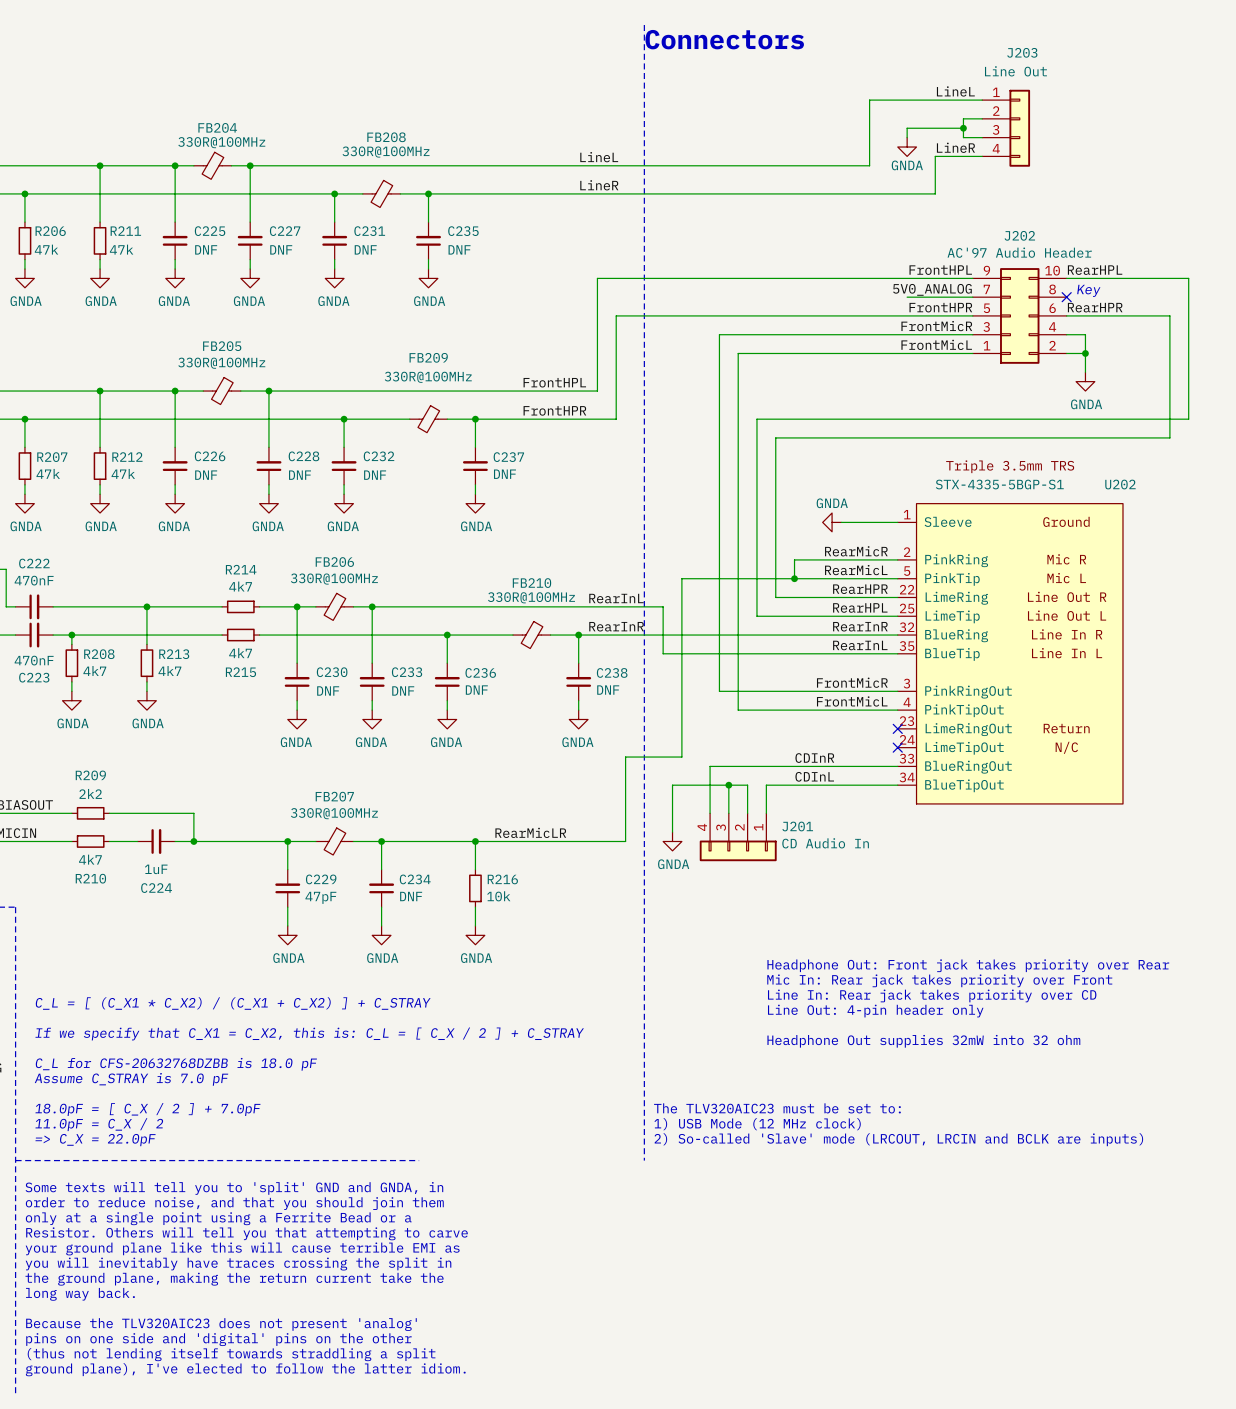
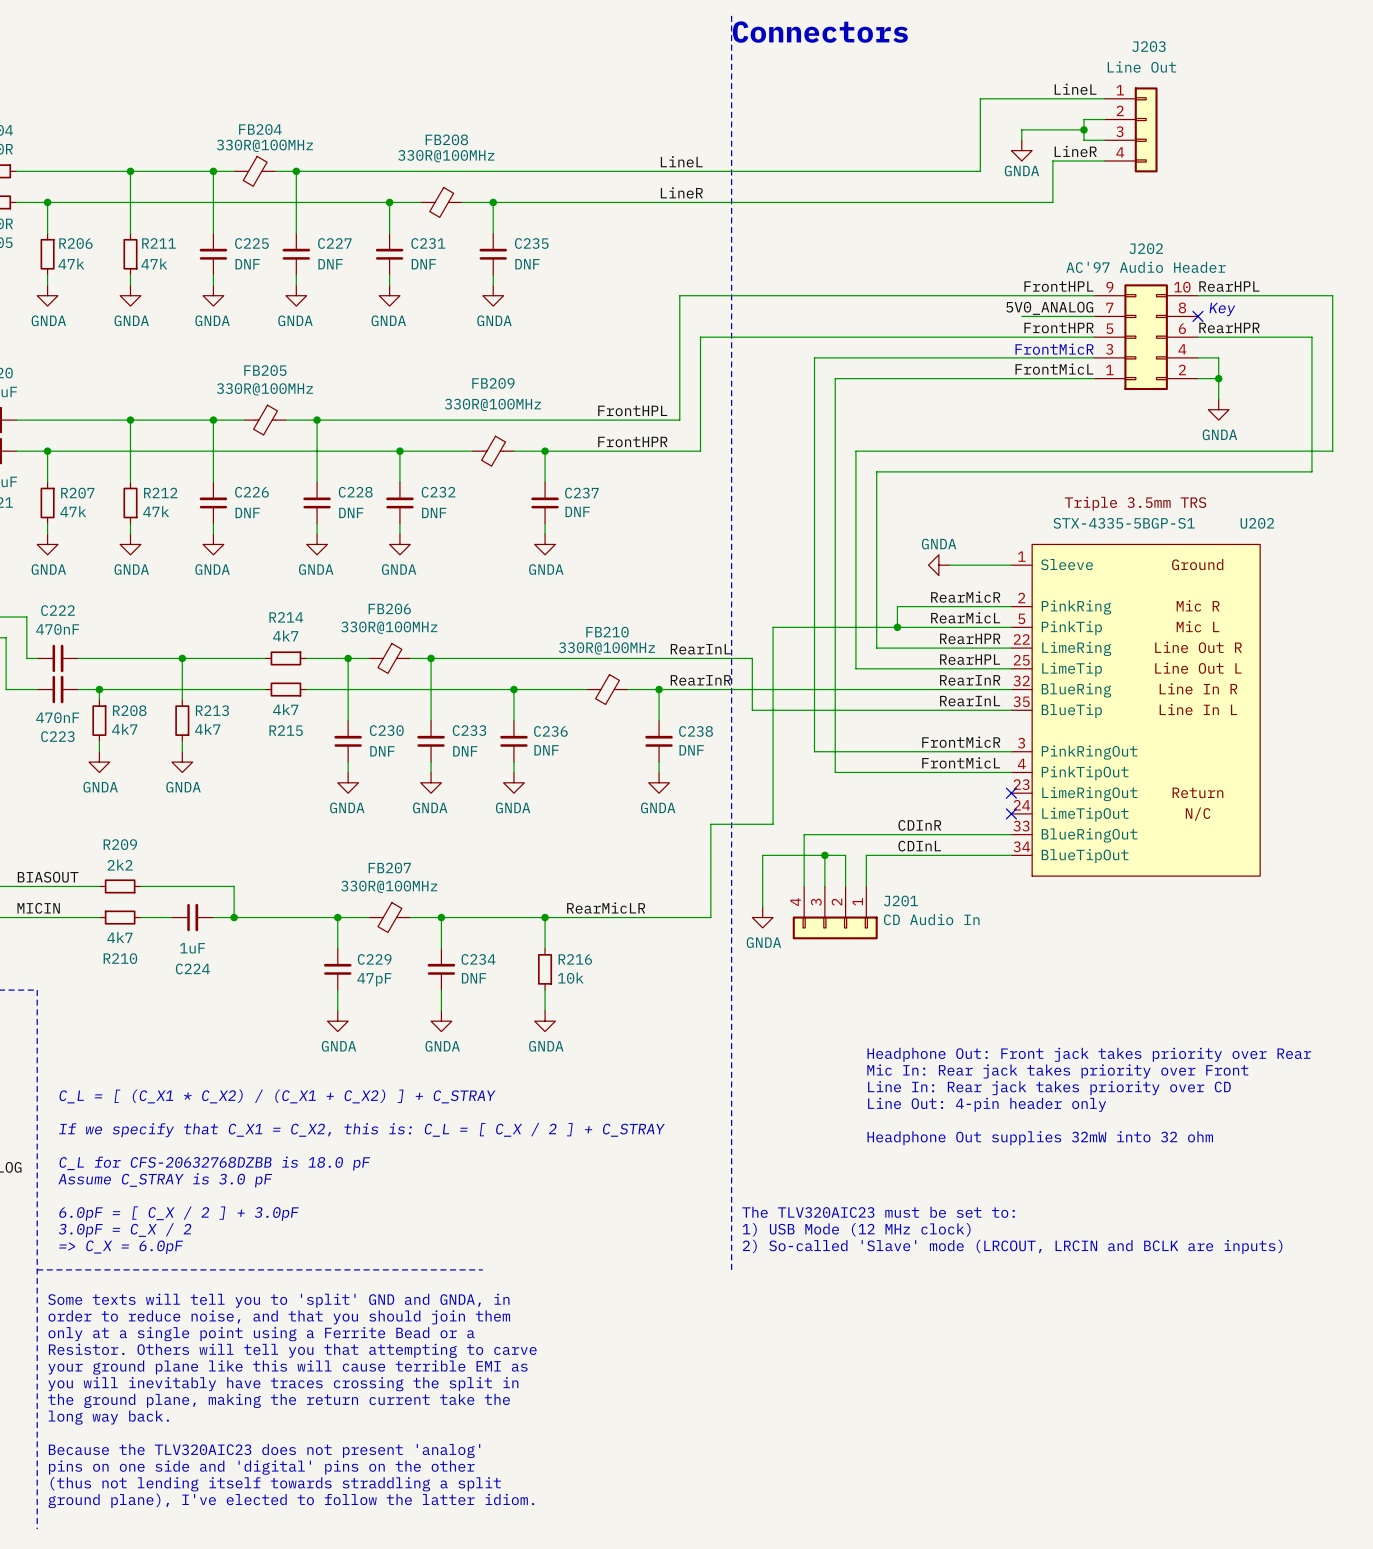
text: none -> FrontMicR (1054, 349)
label: FrontMicR (936, 326) -> none
text: Assume C_STRAY is 7.0 pF (131, 1079) -> Assume C_STRAY is 3.0 pF (165, 1180)
text: 18.0pF = [ C_X / 2 ] + 7.0pF (147, 1109) -> 6.0pF = [ C_X / 2 ] + 3.0pF (179, 1213)
text: 11.0pF = C_X / 2 (99, 1124) -> 3.0pF = C_X / 2 (125, 1230)
text: => C_X = 22.0pF (95, 1140) -> => C_X = 6.0pF (121, 1247)

